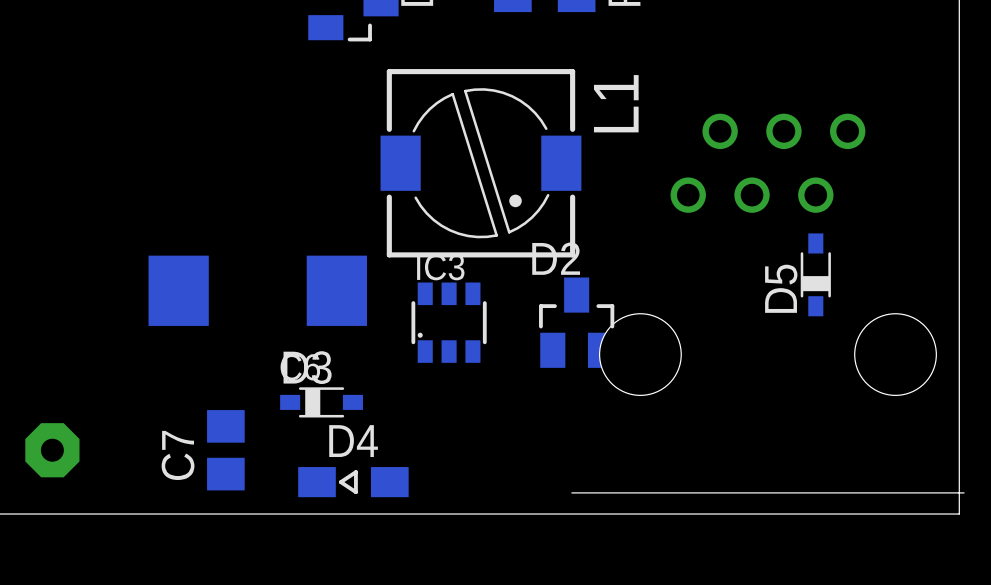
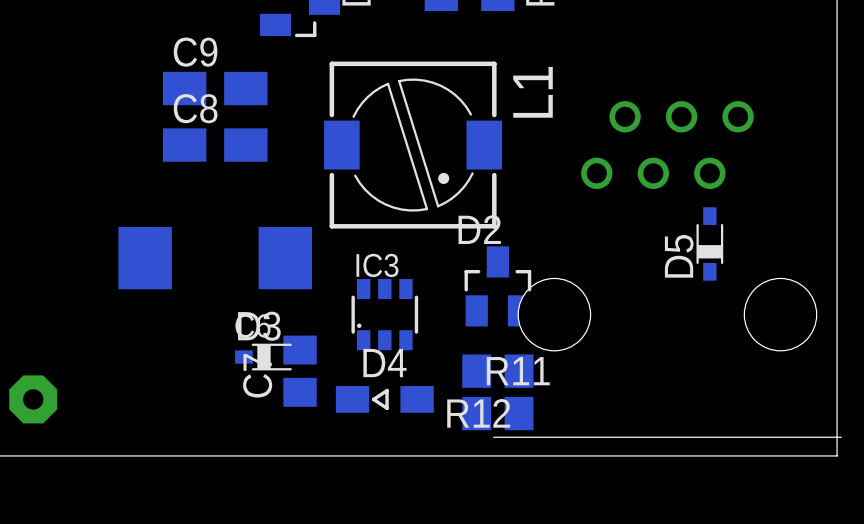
C9: none -> (215, 88)
C8: none -> (215, 145)
IC3 position: (449, 322) -> (384, 314)
R12: none -> (497, 371)
C7 position: (225, 450) -> (300, 371)
R11: none -> (497, 413)
D4 position: (353, 482) -> (384, 399)

